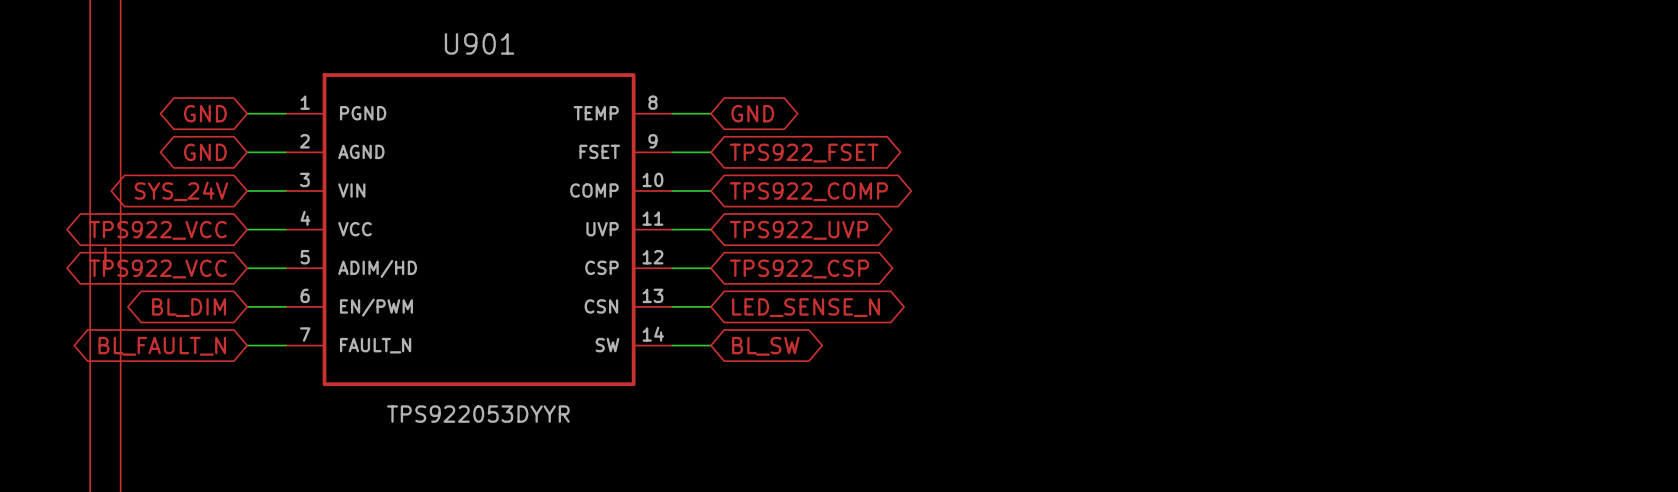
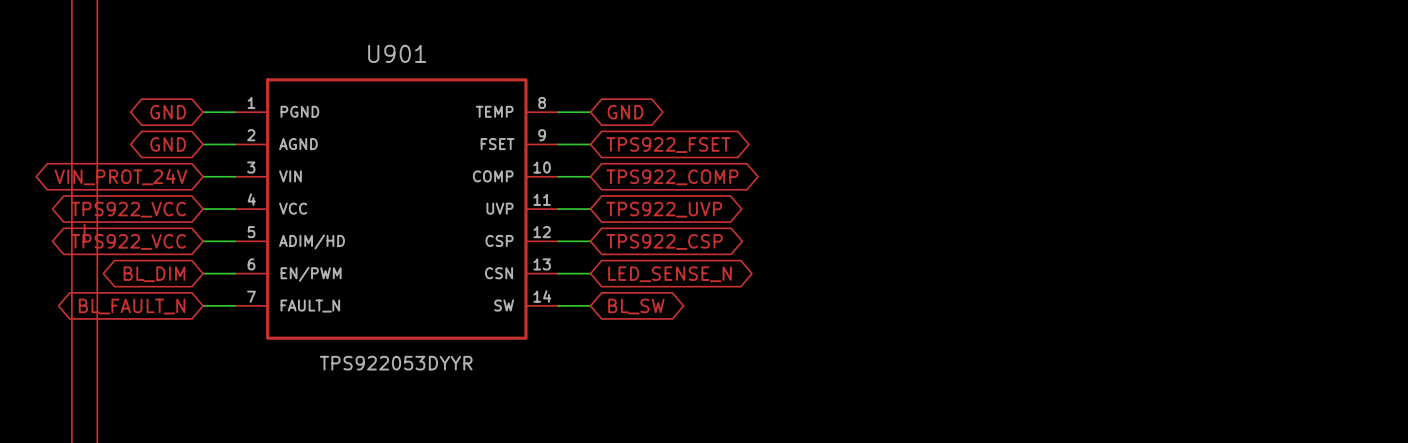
global label: SYS_24V (181, 191) -> VIN_PROT_24V (120, 177)

